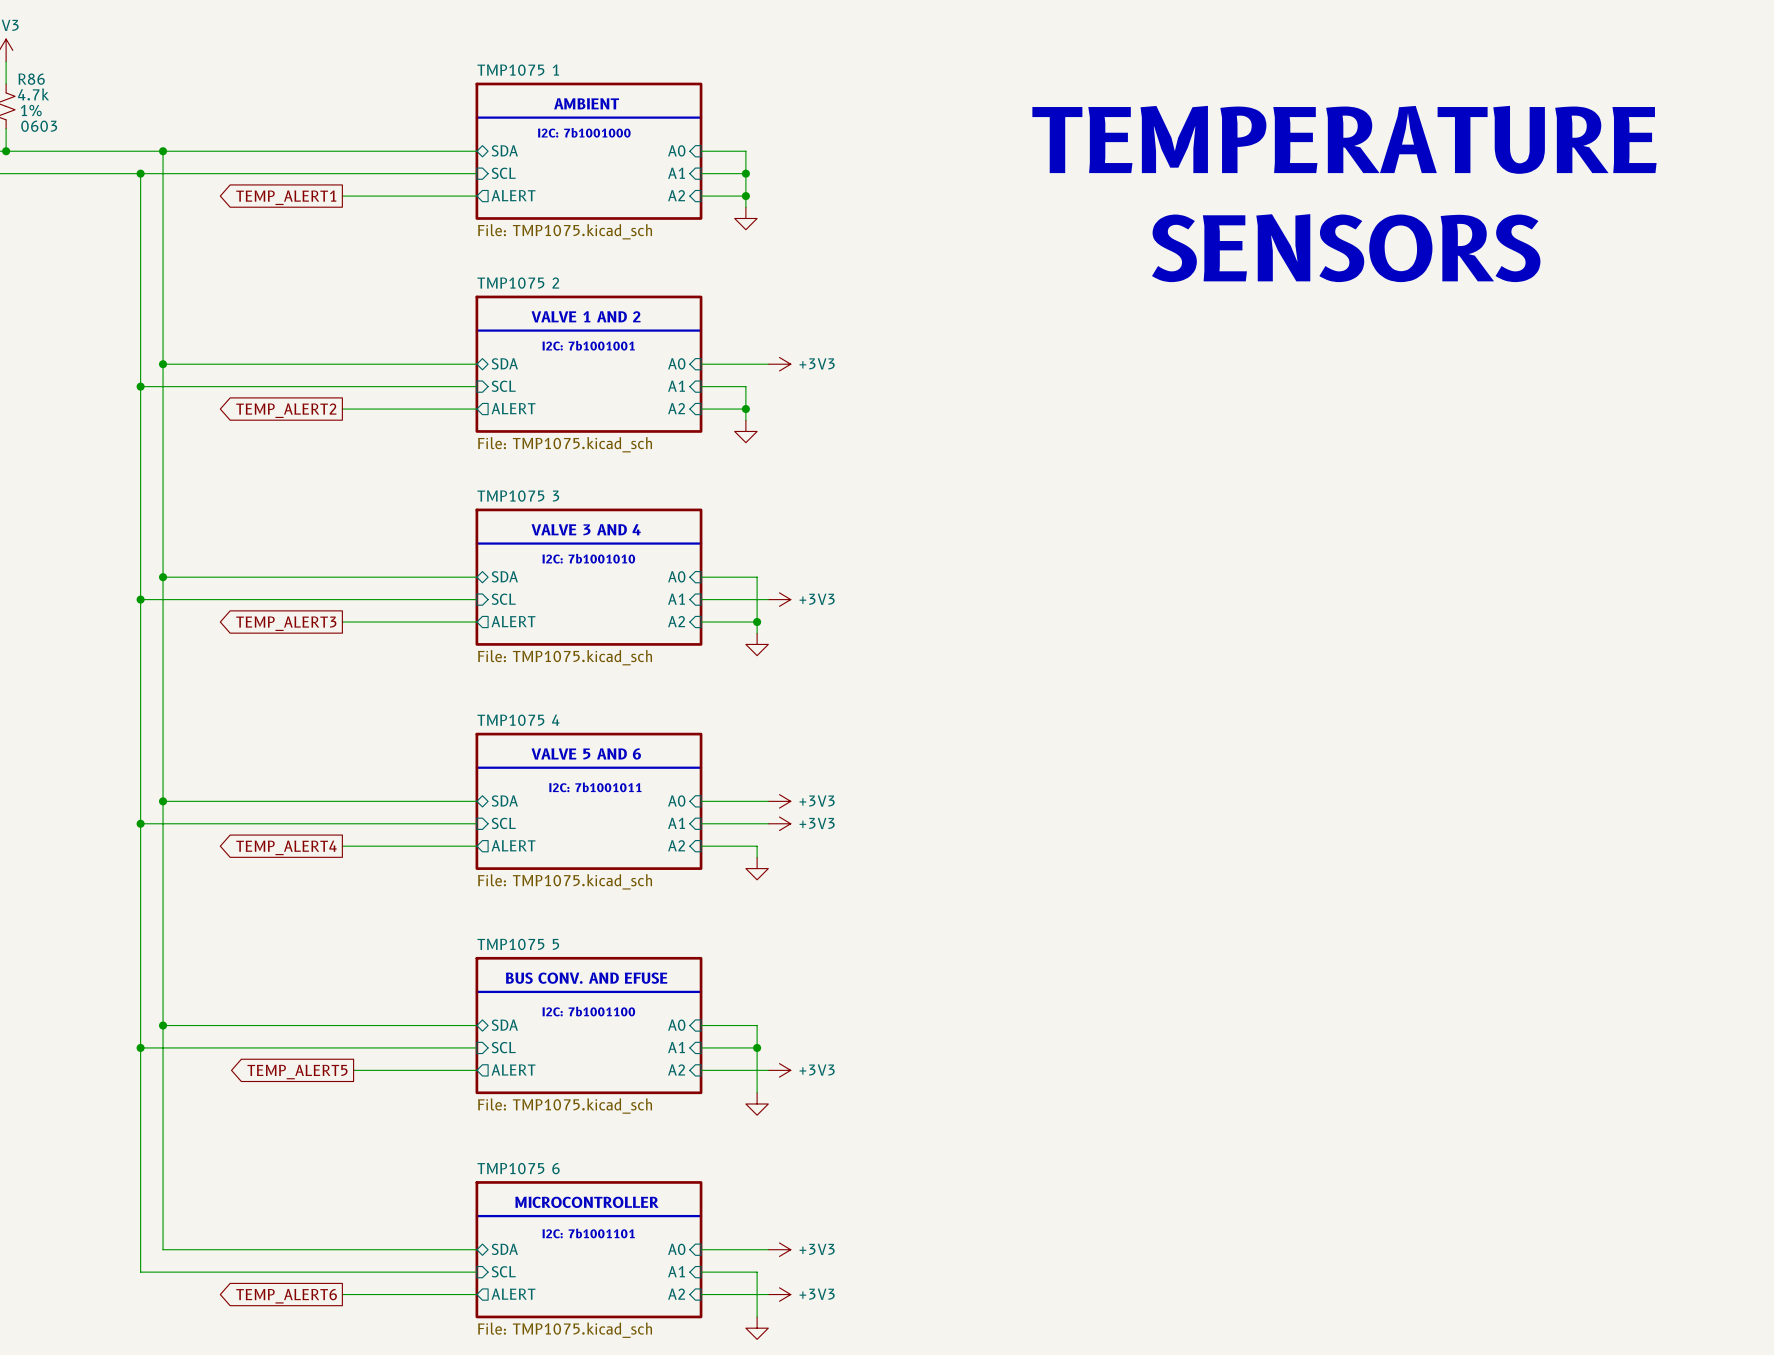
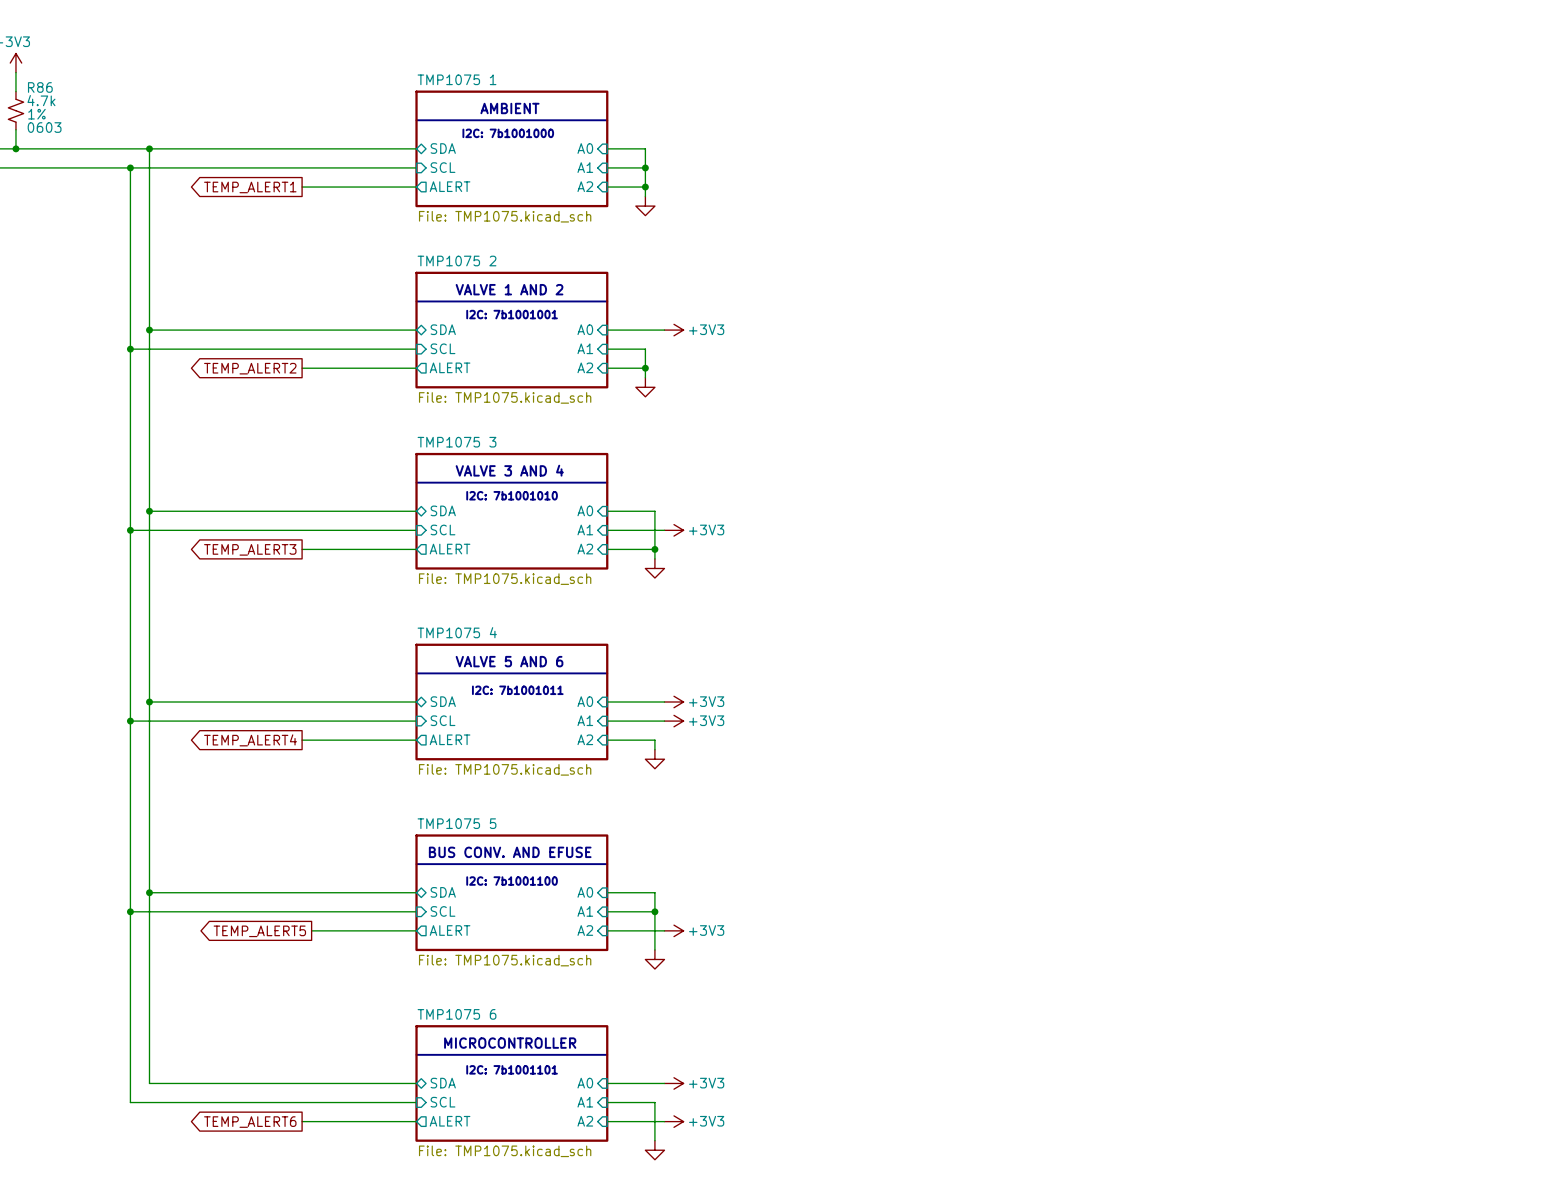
text: TEMPERATURE (1344, 139) -> none
text: SENSORS (1346, 248) -> none

